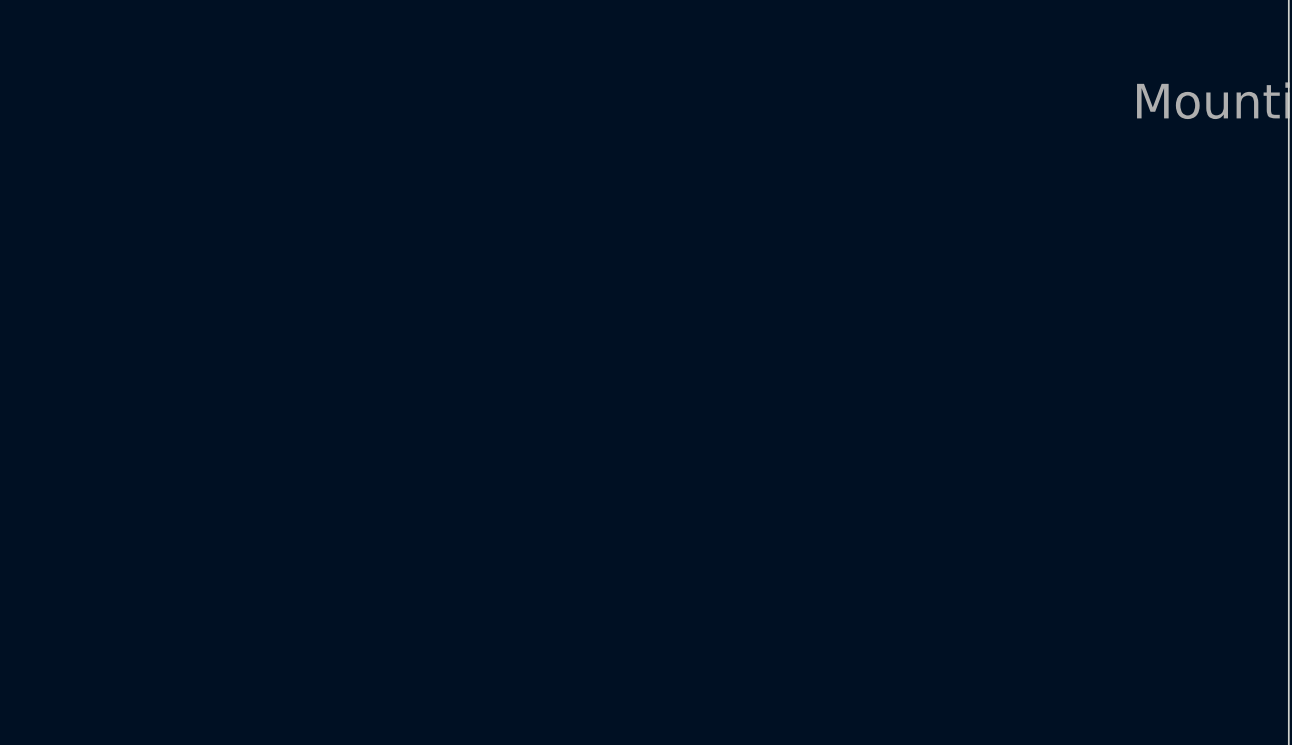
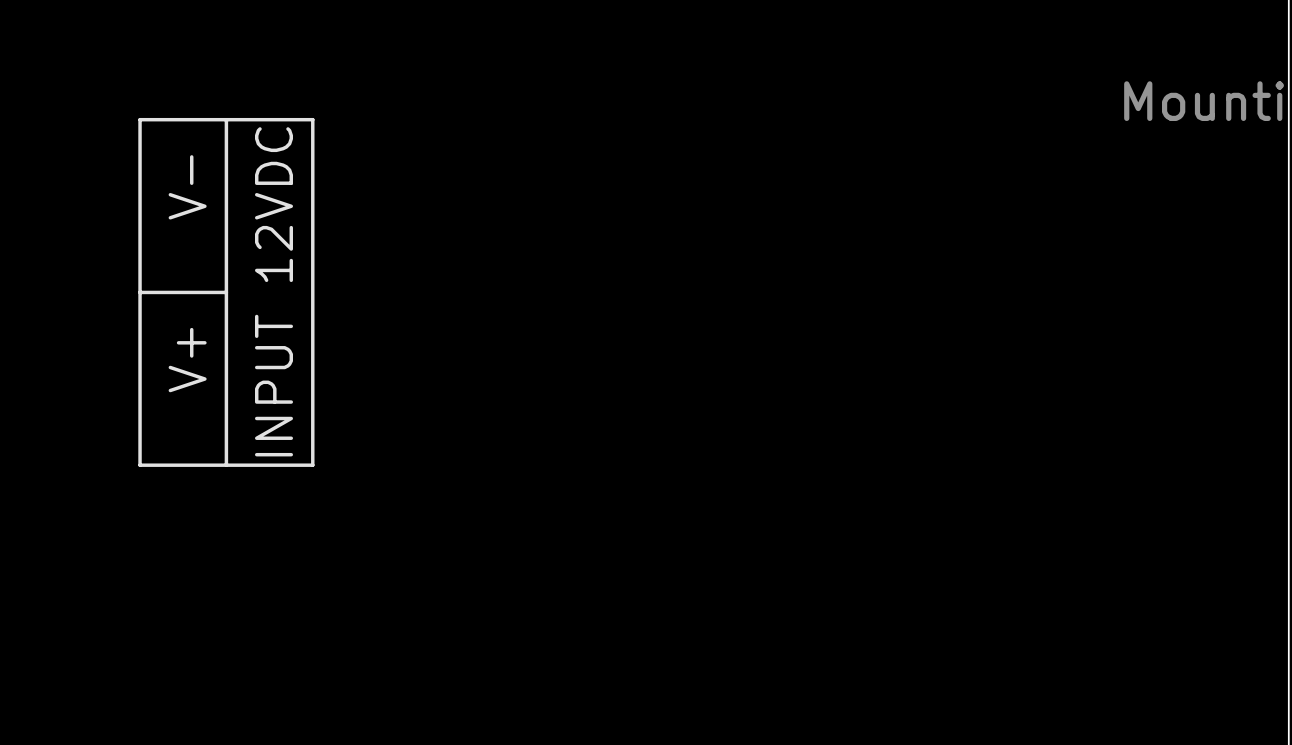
line: none -> (140, 119) (312, 119) (312, 465) (140, 465) (140, 119)
line: none -> (226, 119) (226, 465)
text: none -> V- (187, 187)
line: none -> (140, 292) (226, 292)
text: none -> INPUT 12VDC (274, 291)
text: none -> V+ (187, 360)

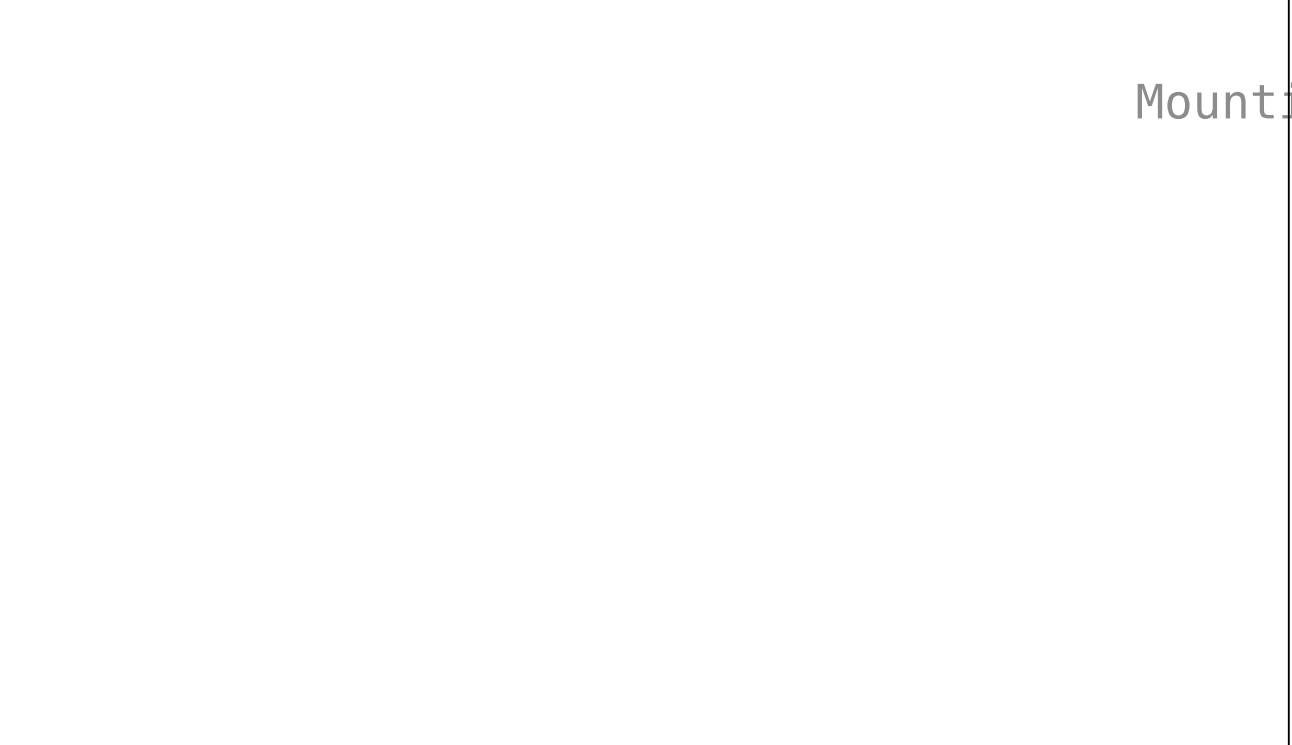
line: (140, 119) (312, 119) (312, 465) (140, 465) (140, 119) -> none
line: (226, 119) (226, 465) -> none
text: V- (187, 187) -> none
text: INPUT 12VDC (274, 291) -> none
line: (140, 292) (226, 292) -> none
text: V+ (187, 360) -> none

